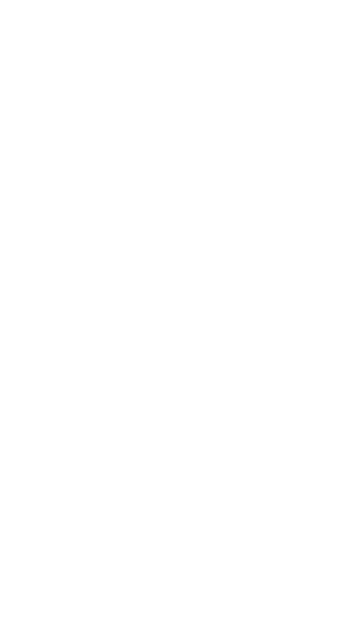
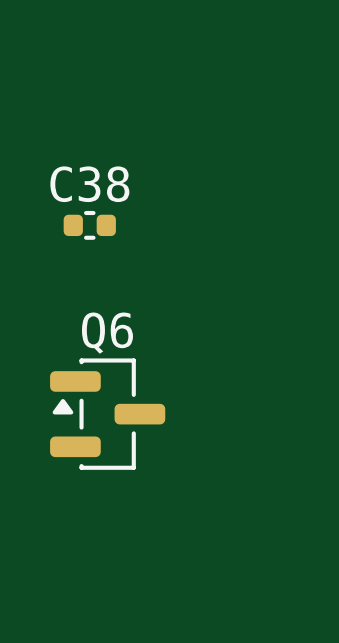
C38: none -> (89, 225)
Q6: none -> (107, 414)

